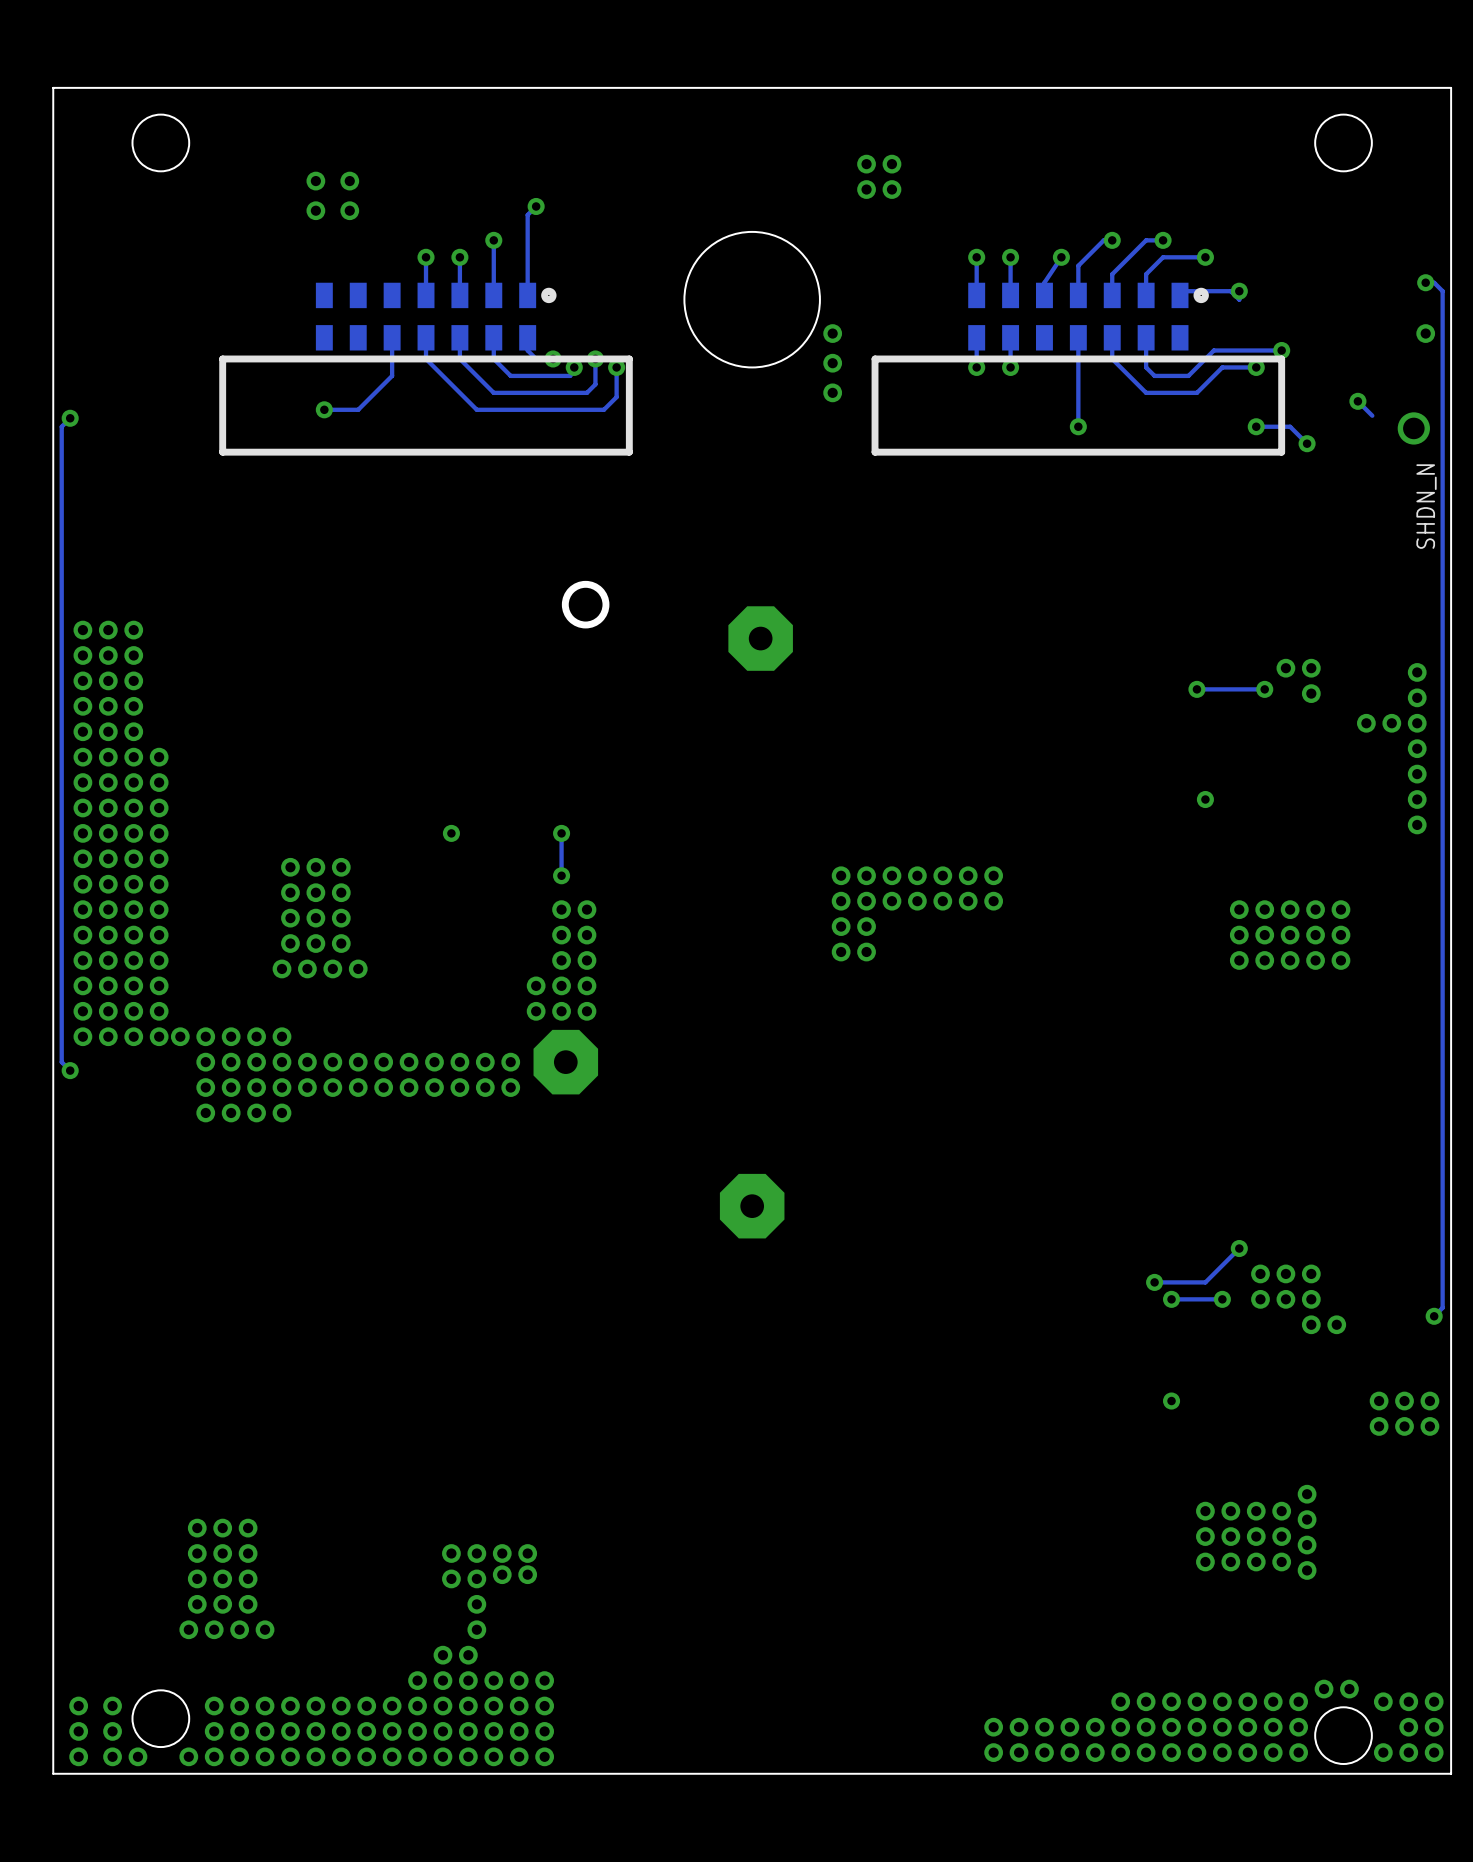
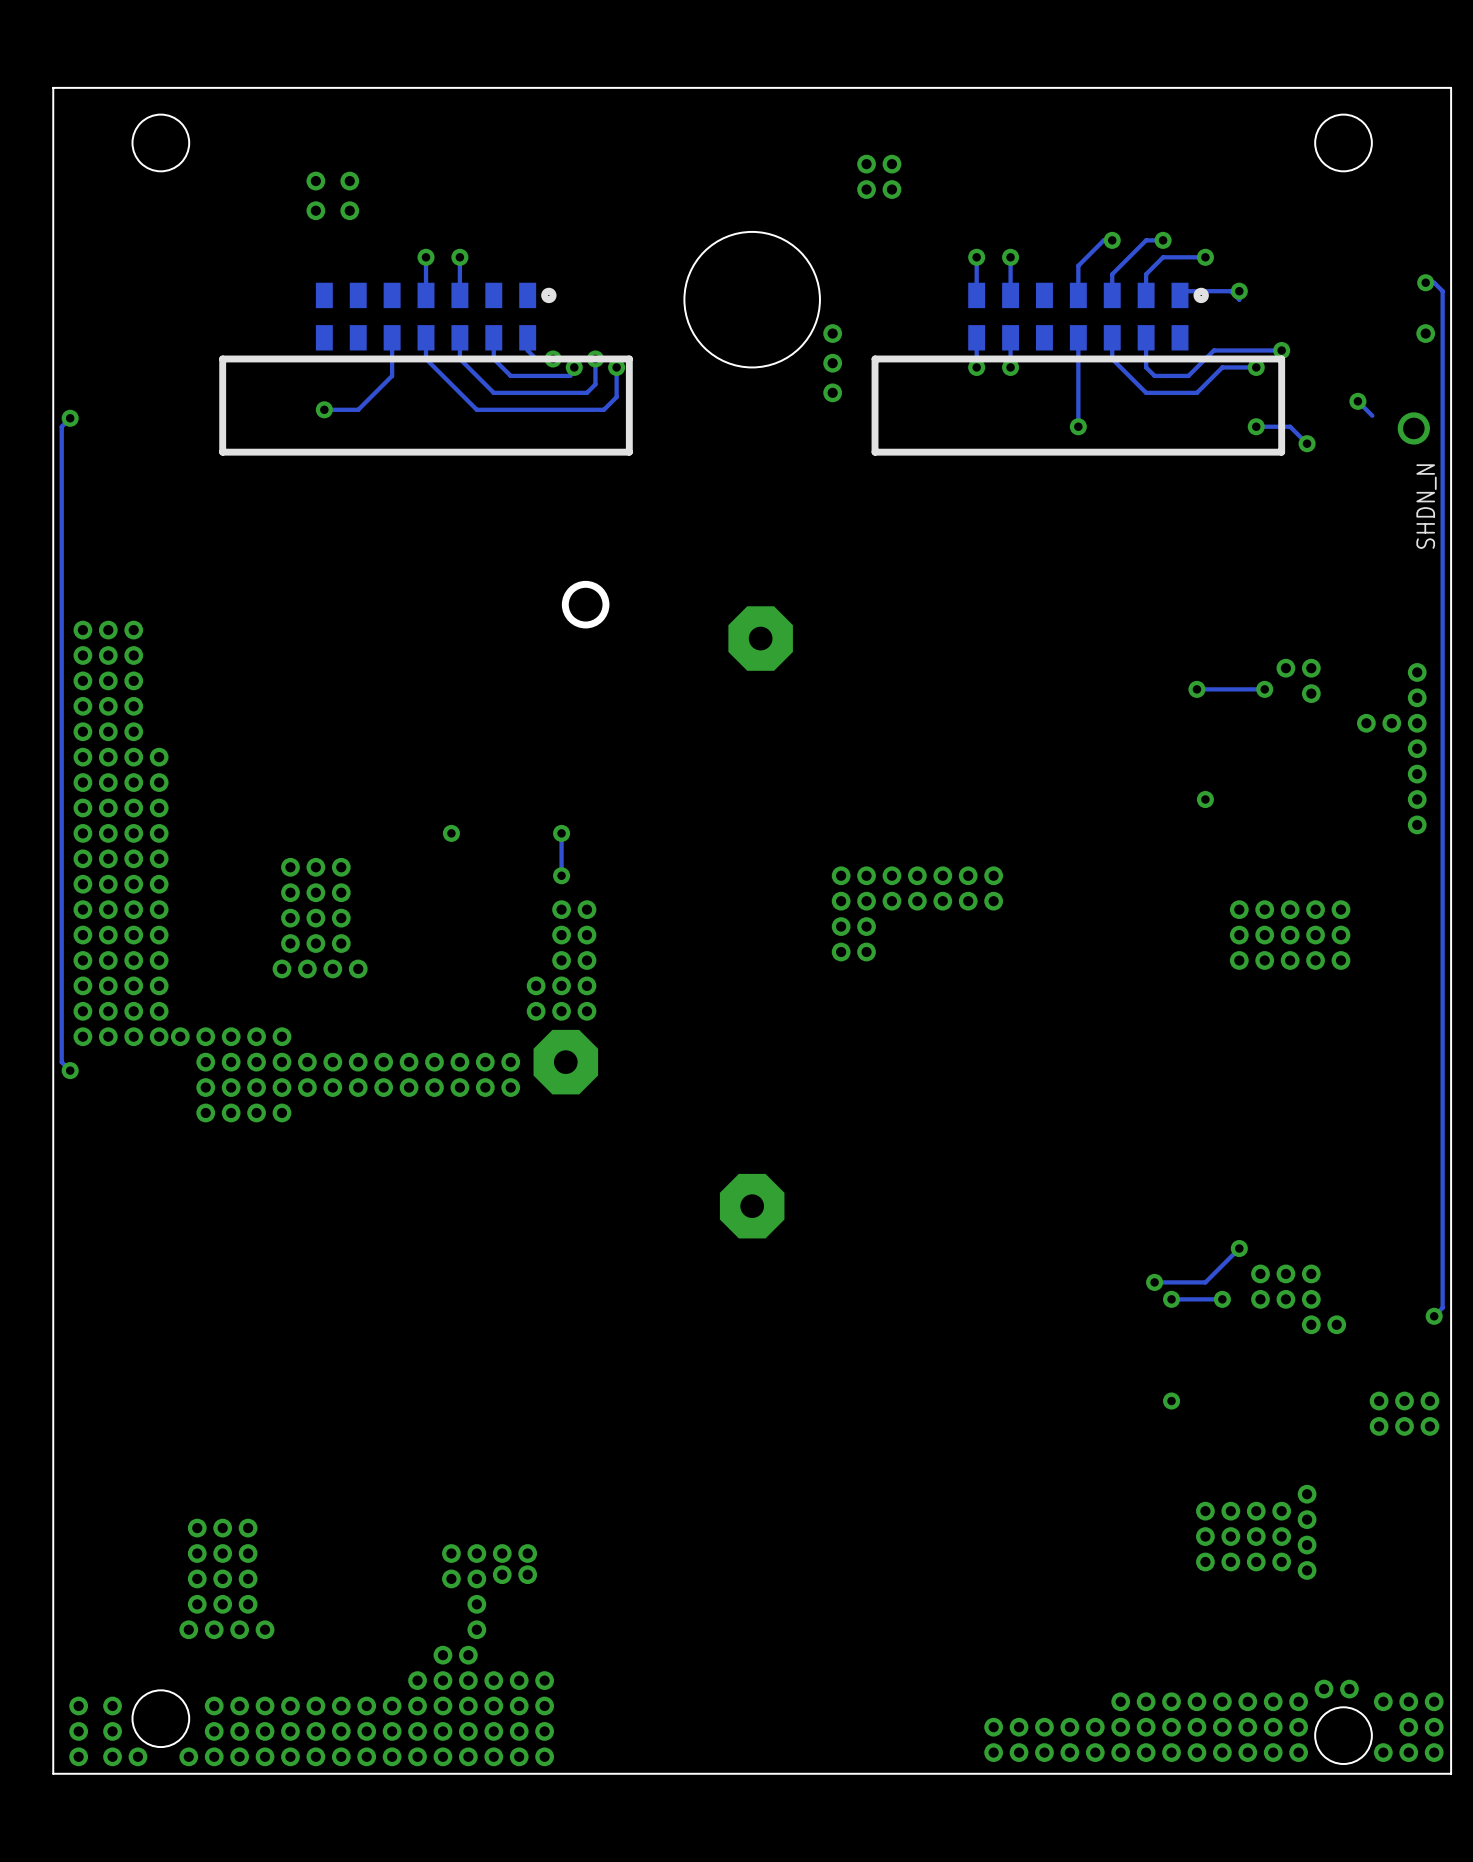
track: (536, 206) (527, 214) (527, 295) -> none
via: (536, 206) -> none
track: (493, 240) (493, 295) -> none
via: (493, 240) -> none
track: (1061, 257) (1044, 282) (1044, 295) -> none
via: (1061, 257) -> none

